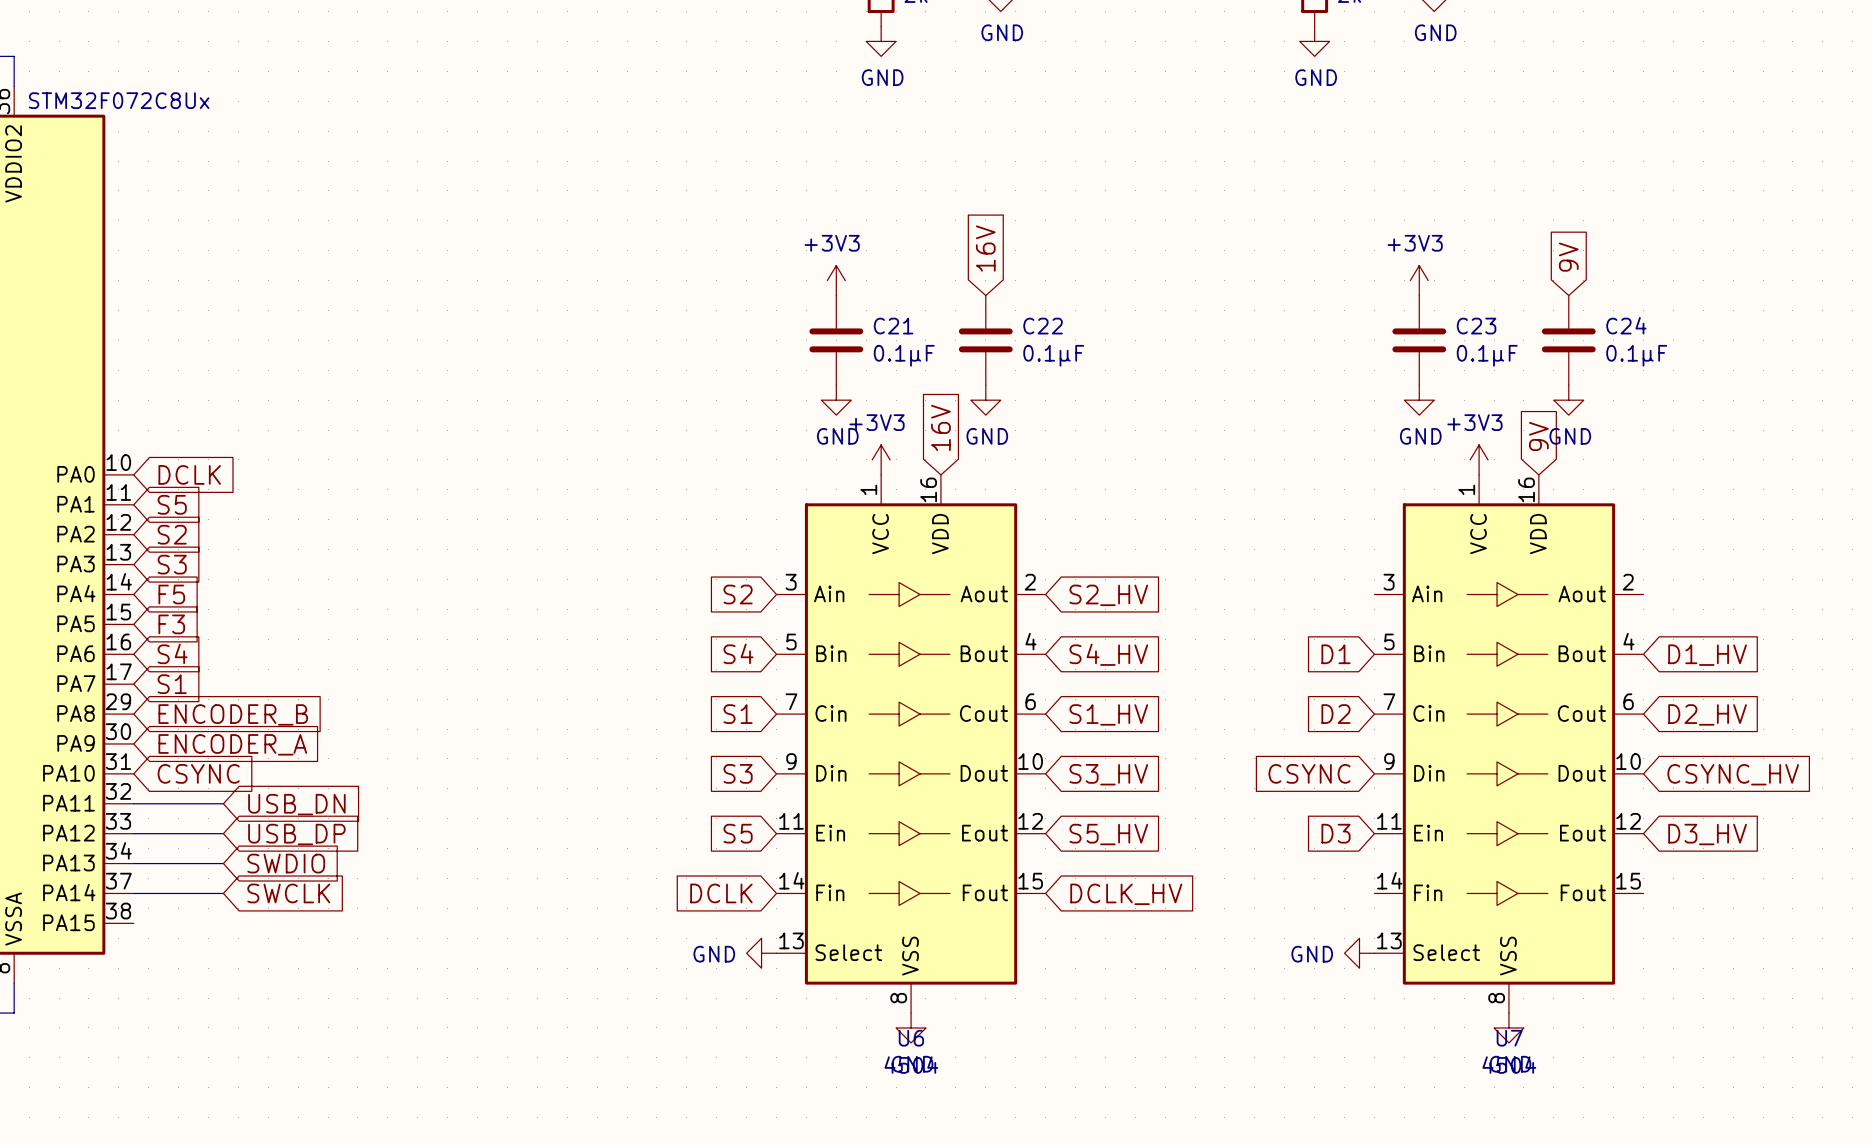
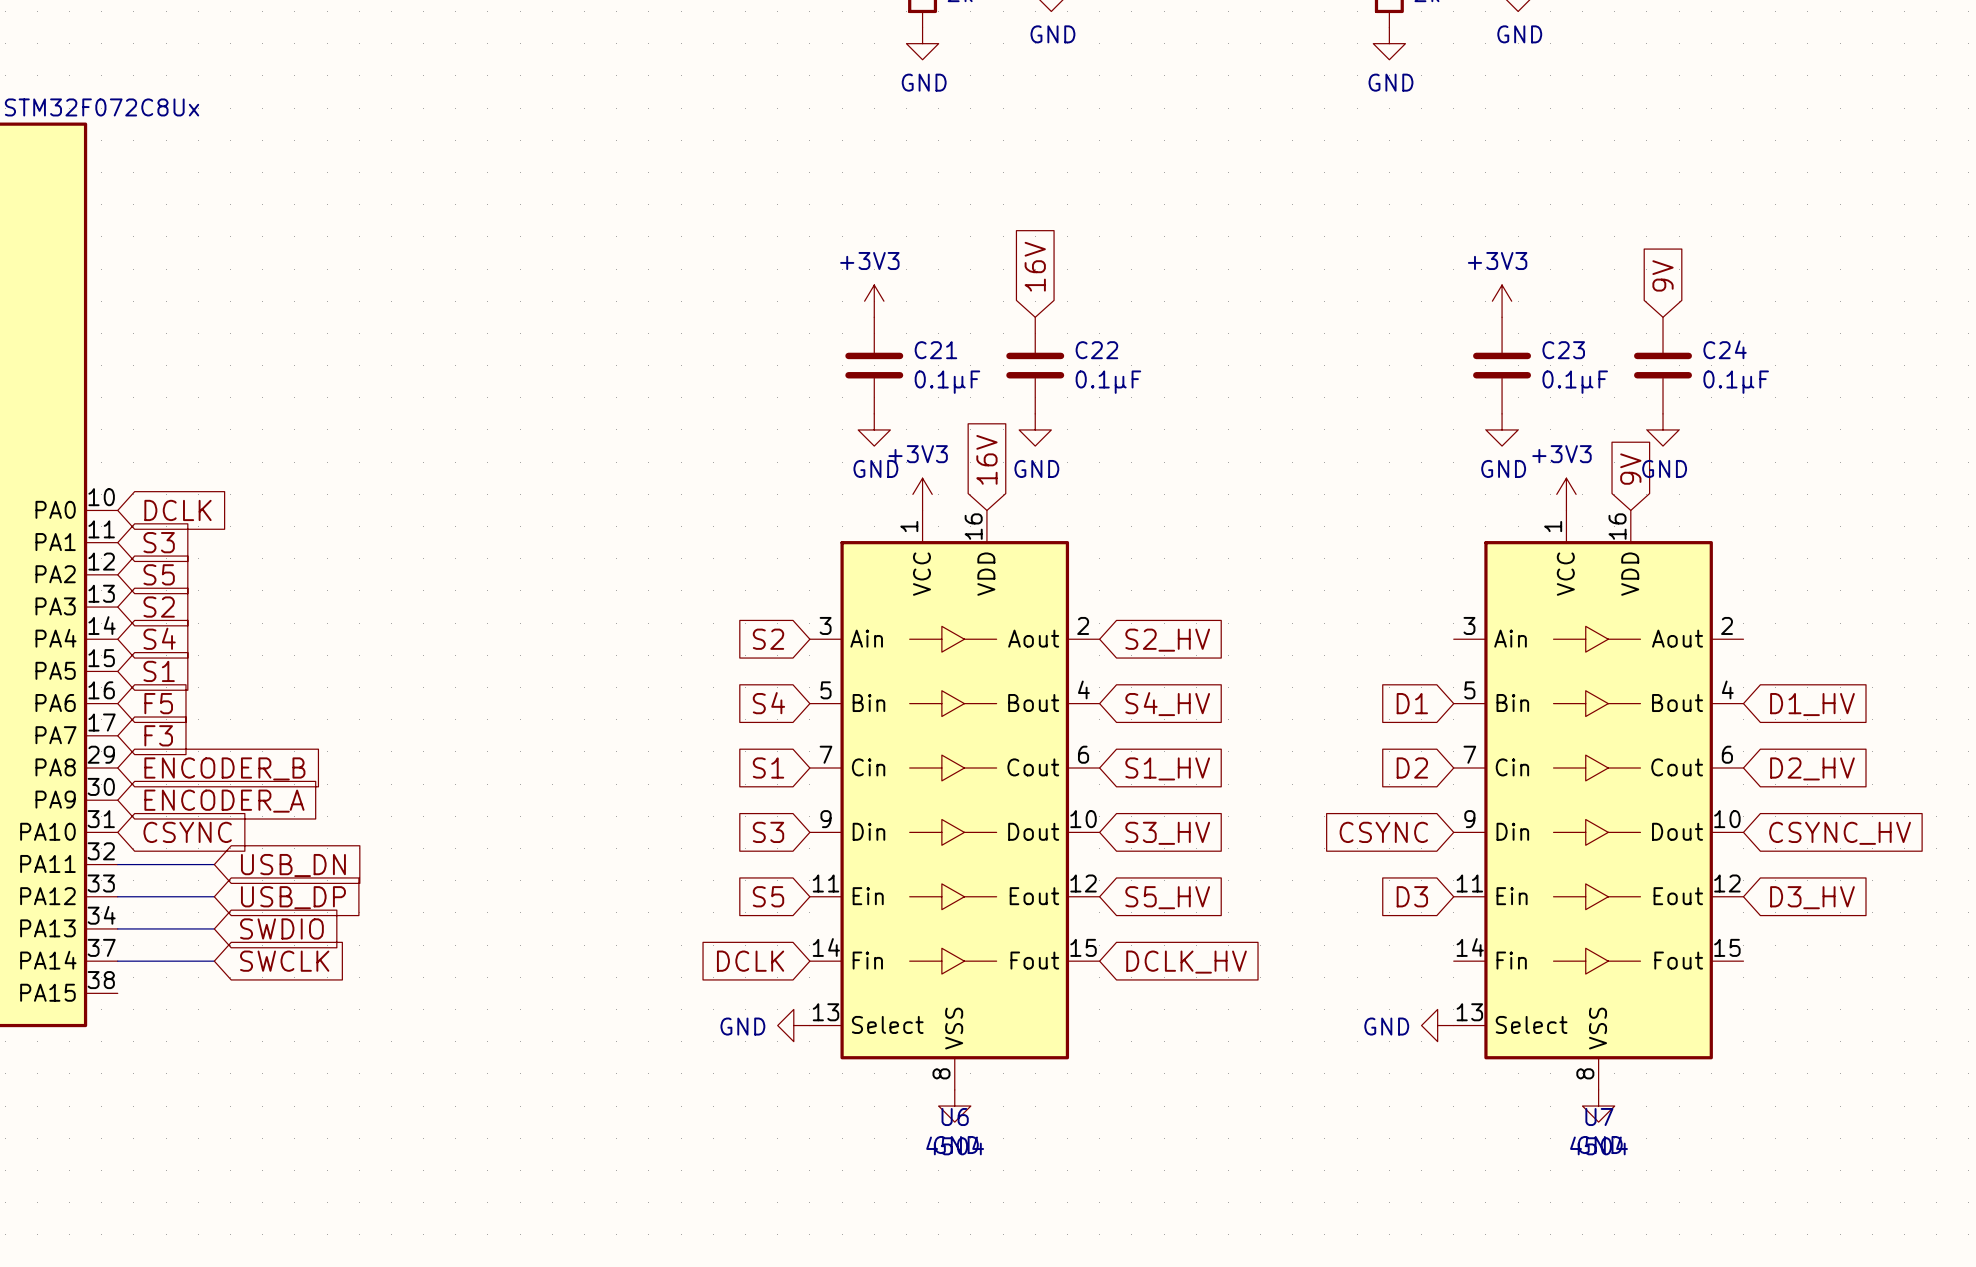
global label: S5 (172, 504) -> S3 (159, 542)
global label: S2 (172, 534) -> S5 (159, 574)
global label: S3 (172, 564) -> S2 (159, 607)
global label: F5 (171, 594) -> S4 (159, 638)
global label: F3 (171, 624) -> S1 (159, 671)
global label: S4 (172, 653) -> F5 (158, 703)
global label: S1 (172, 684) -> F3 (158, 735)

